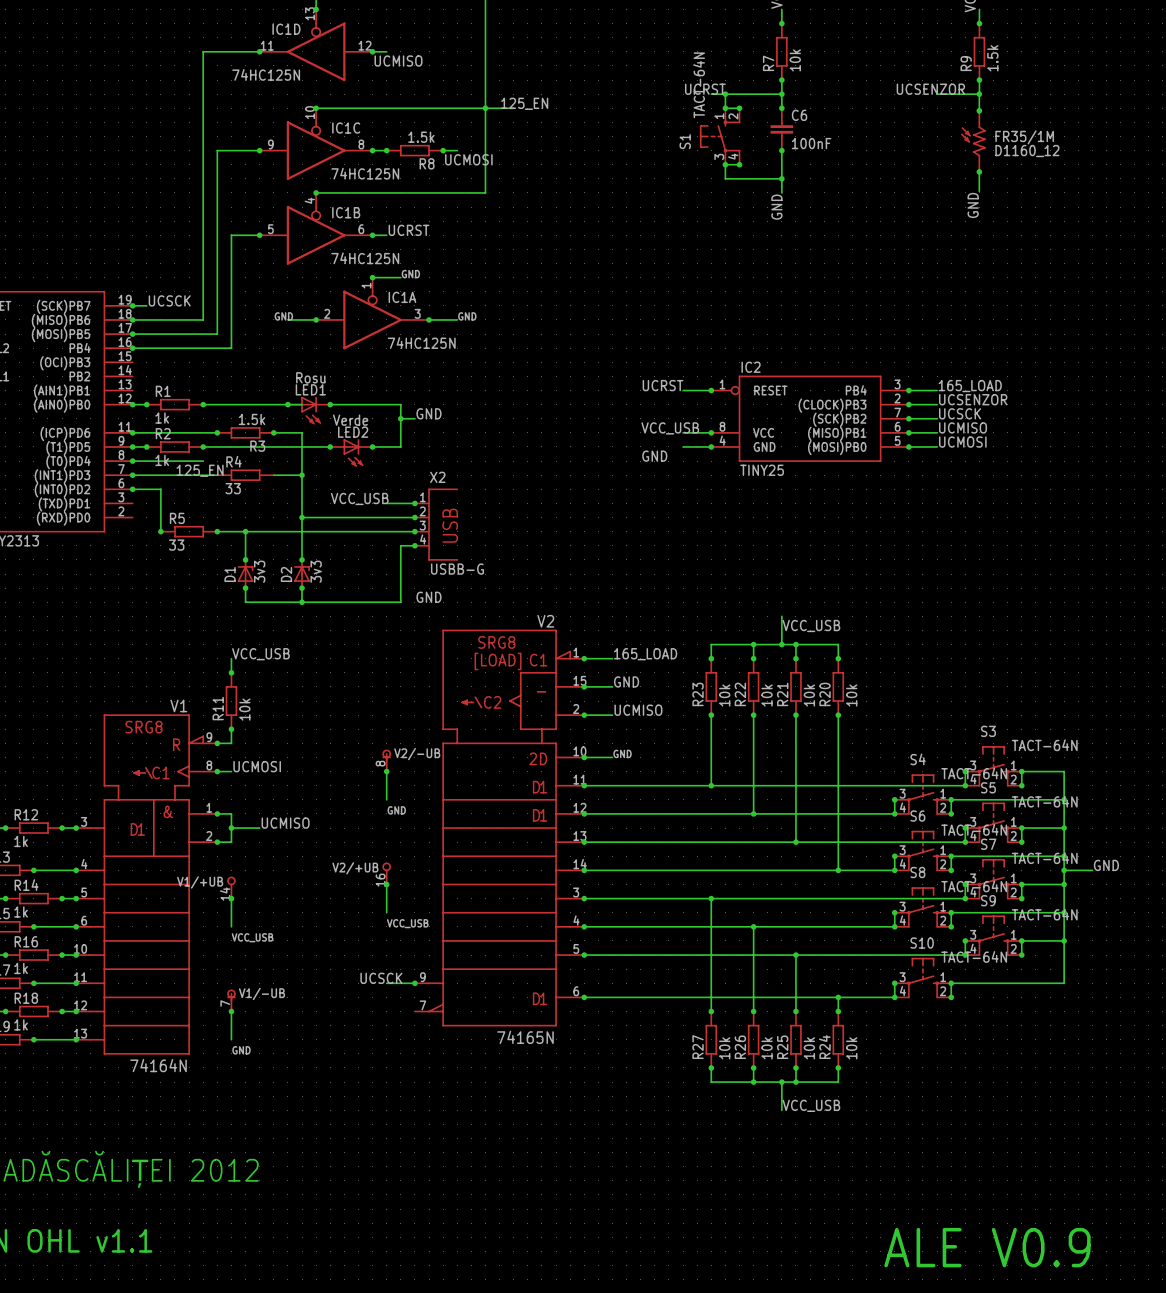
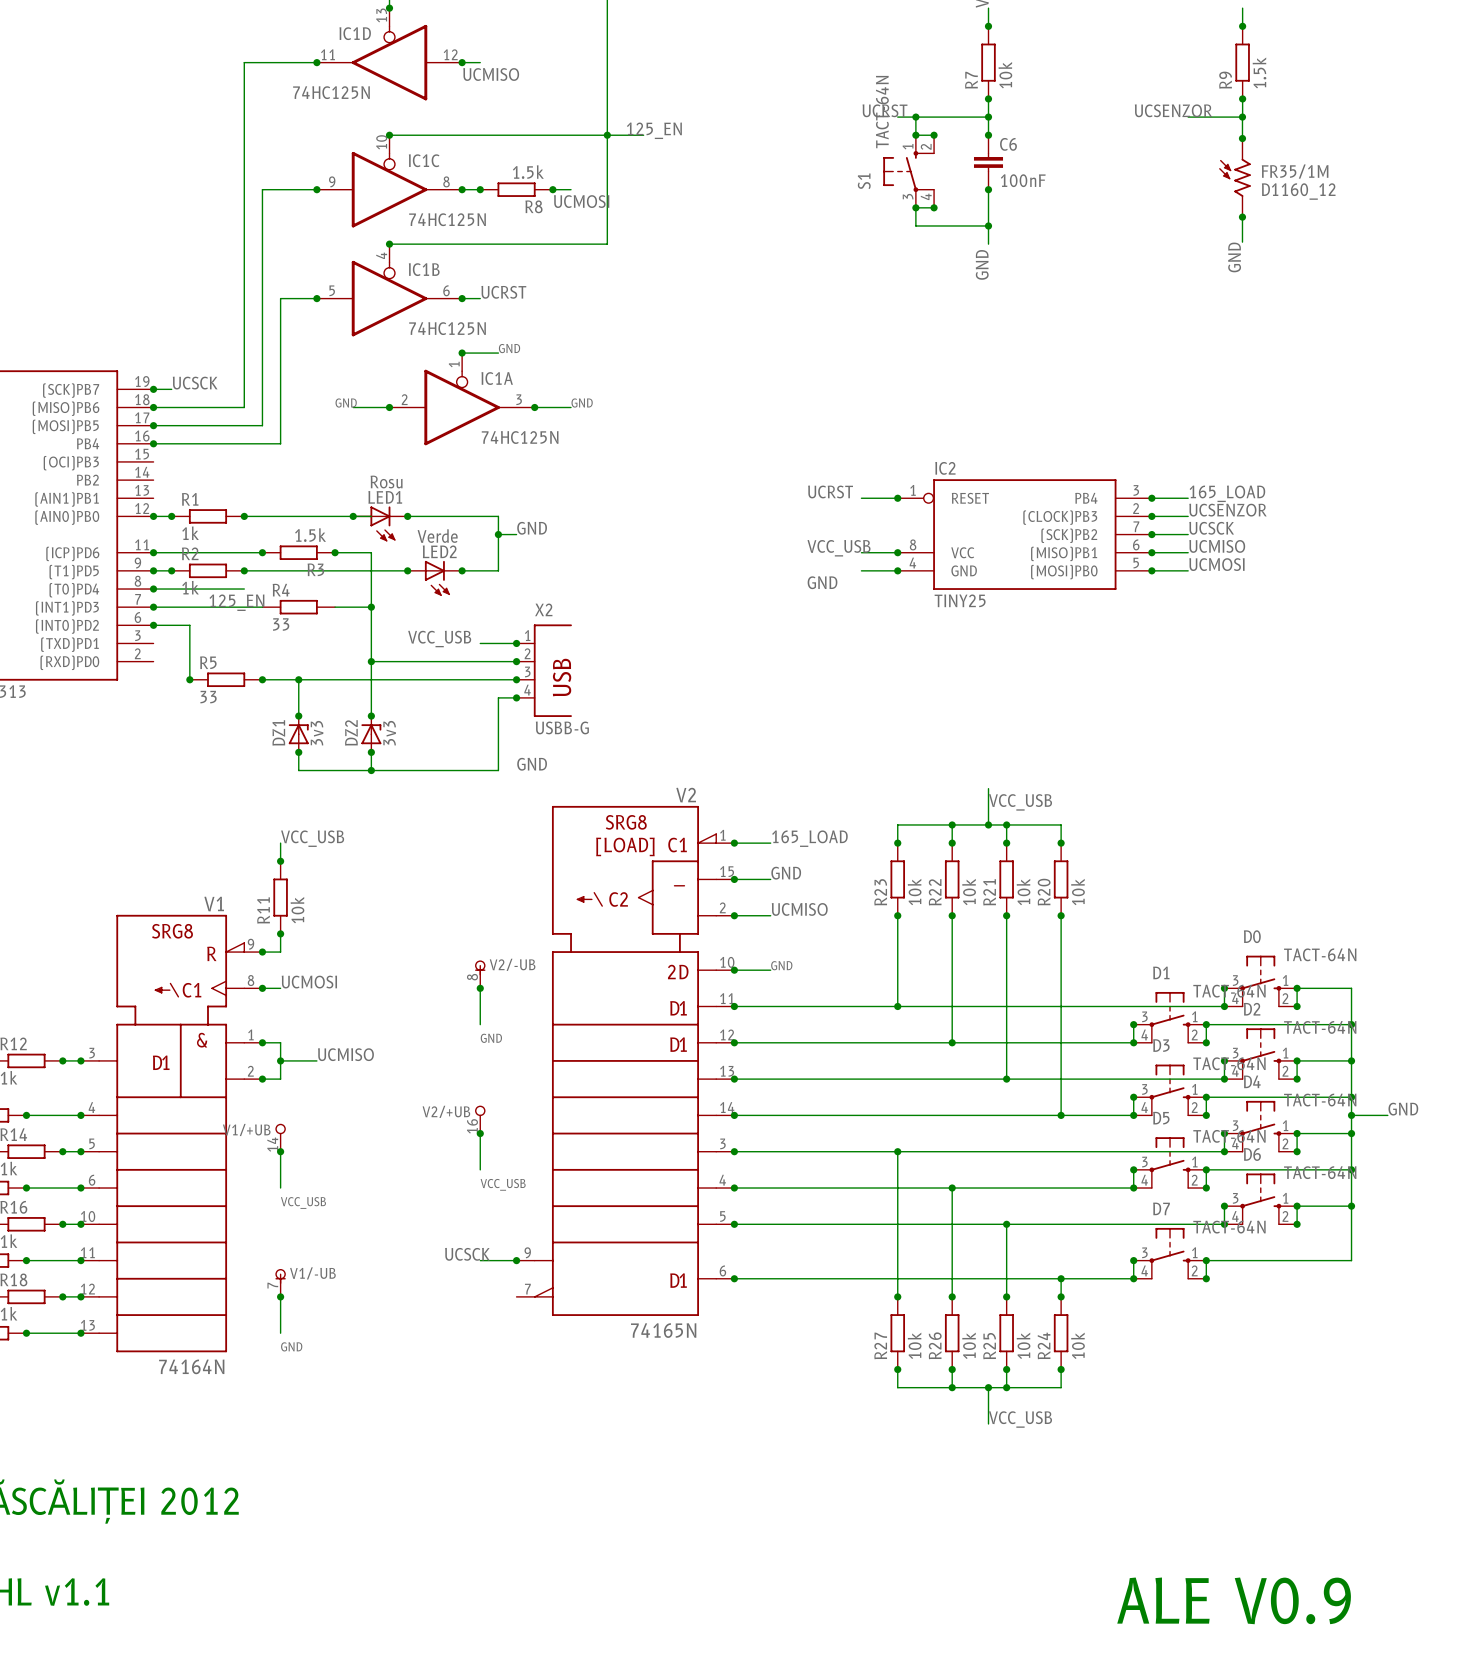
D1 name: D1 (230, 574) -> DZ1 (278, 732)
D2 name: D2 (286, 574) -> DZ2 (351, 732)
S3 name: S3 (988, 731) -> D0 (1252, 936)
S4 name: S4 (918, 759) -> D1 (1161, 972)
S5 name: S5 (988, 787) -> D2 (1252, 1009)
S6 name: S6 (917, 816) -> D3 (1161, 1045)
S7 name: S7 (988, 844) -> D4 (1252, 1081)
S8 name: S8 (917, 872) -> D5 (1161, 1118)
S9 name: S9 (988, 900) -> D6 (1252, 1154)
S10 name: S10 (922, 943) -> D7 (1161, 1208)

